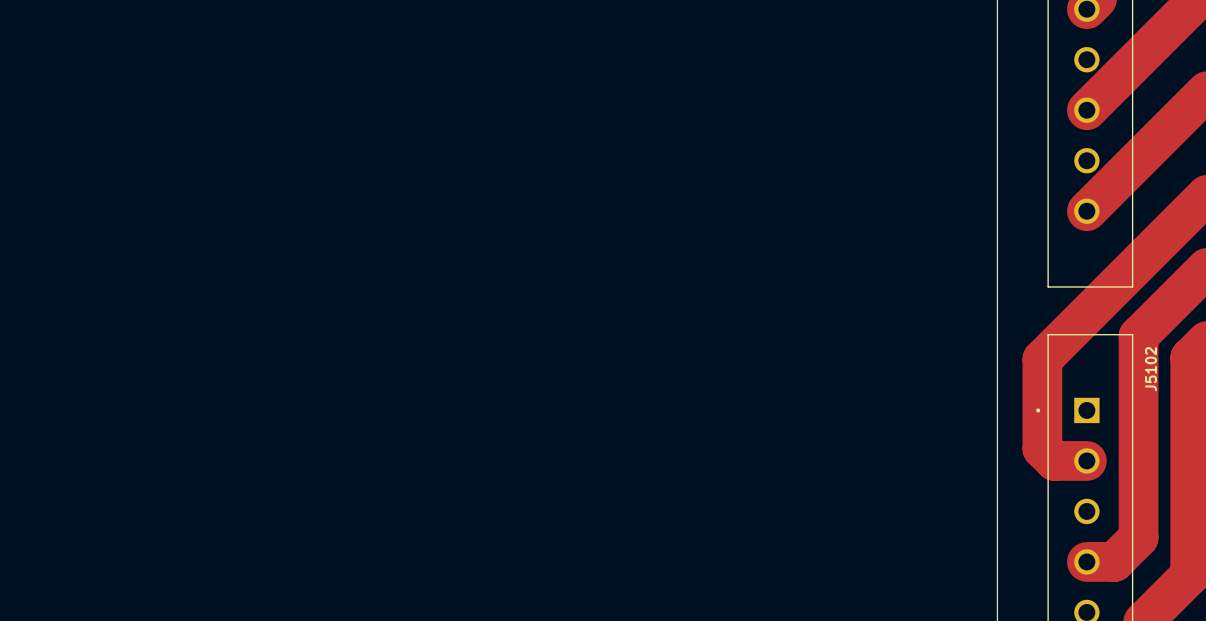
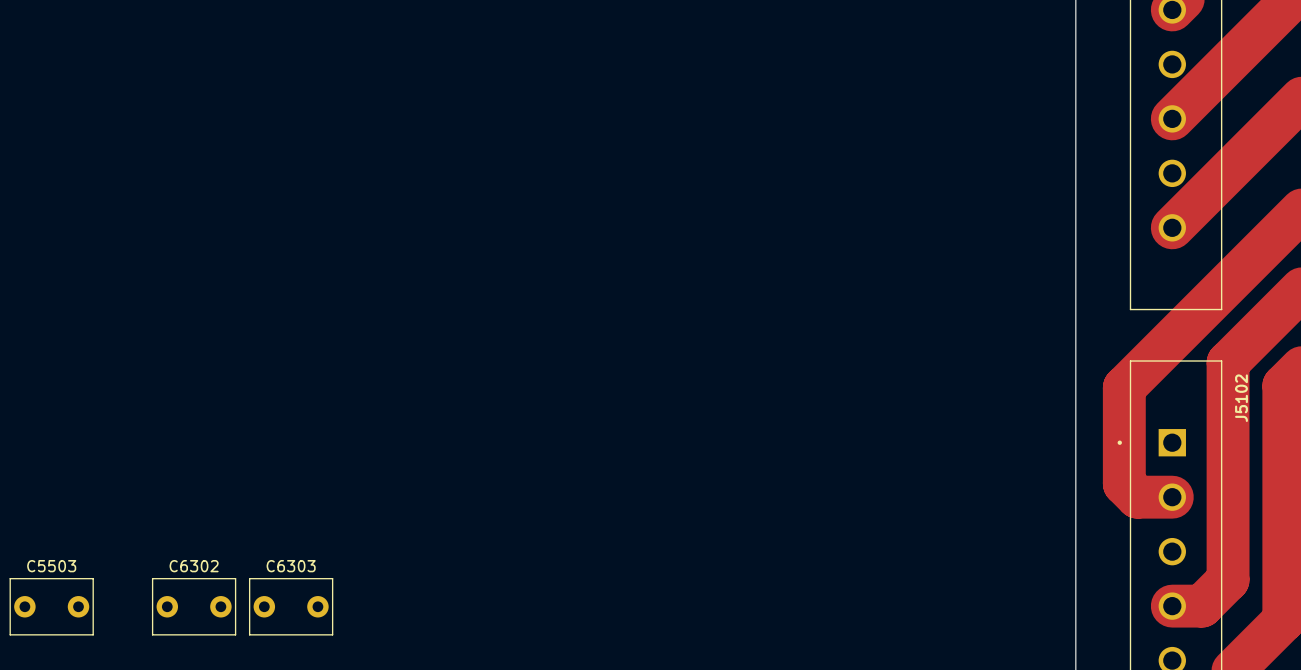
C5503: none -> (51, 606)
C6302: none -> (194, 606)
C6303: none -> (291, 606)

